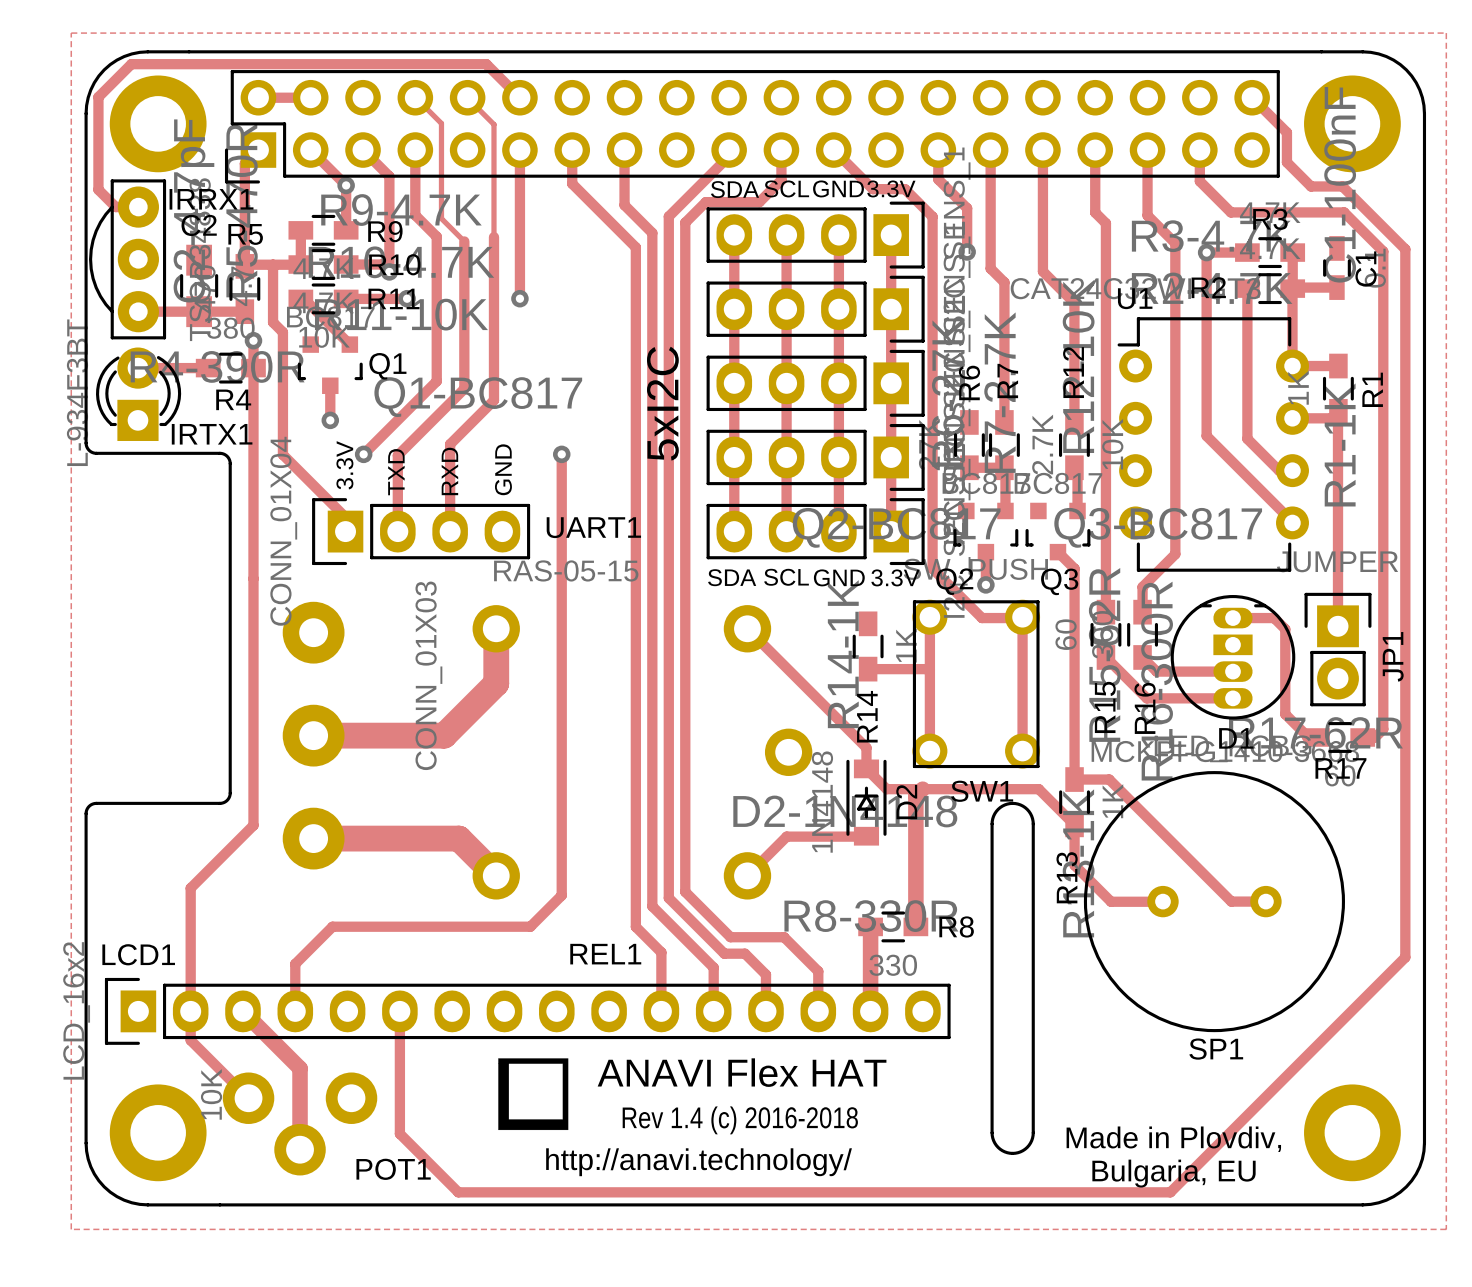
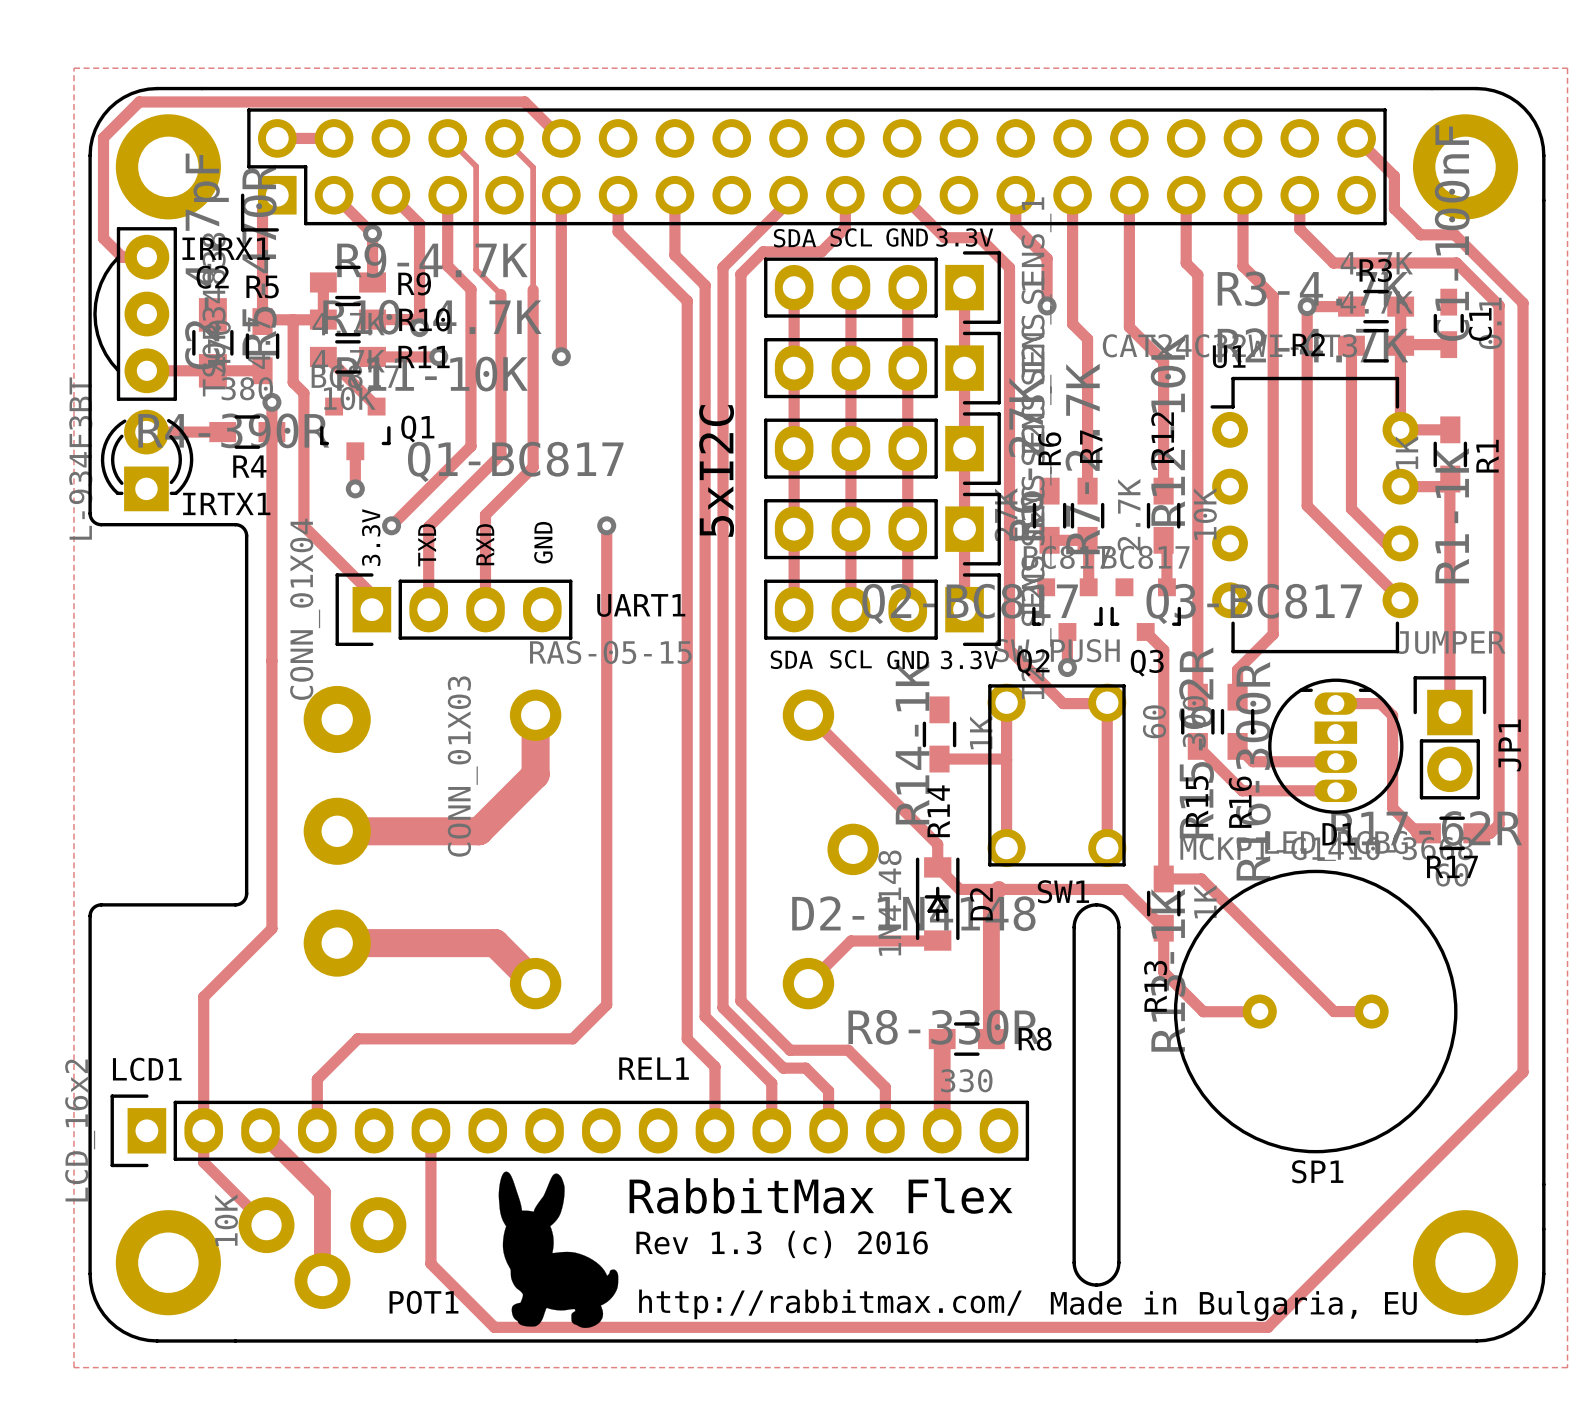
drawing: none -> [498, 1171, 619, 1329]
drawing: [498, 1058, 569, 1131] -> none
text: ANAVI Flex HAT (742, 1072) -> RabbitMax Flex (821, 1195)
text: Rev 1.4 (c) 2016-2018 (740, 1120) -> Rev 1.3 (c) 2016 (782, 1244)
text: Made in Plovdiv, (1173, 1139) -> none
text: http://anavi.technology/ (699, 1162) -> none
text: none -> http://rabbitmax.com/ (830, 1304)
text: none -> Made in Bulgaria, EU (1233, 1305)
text: Bulgaria, EU (1174, 1173) -> none

